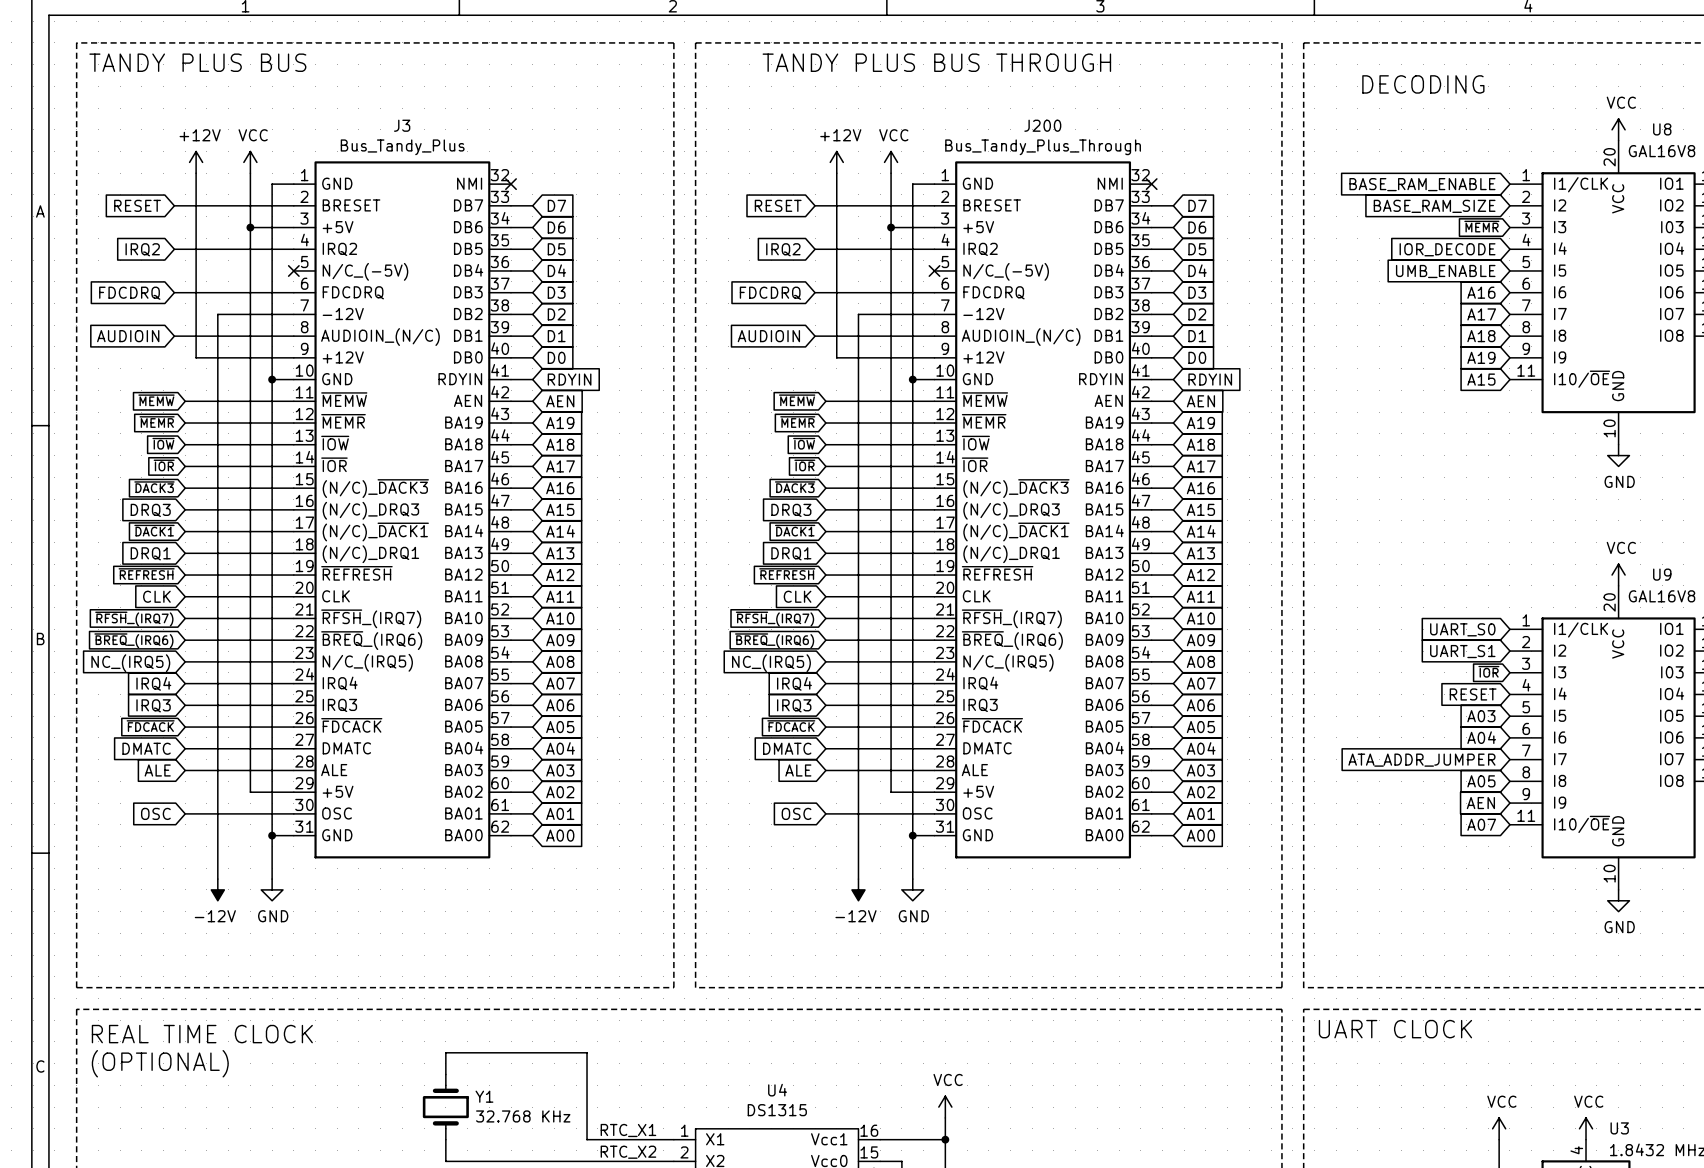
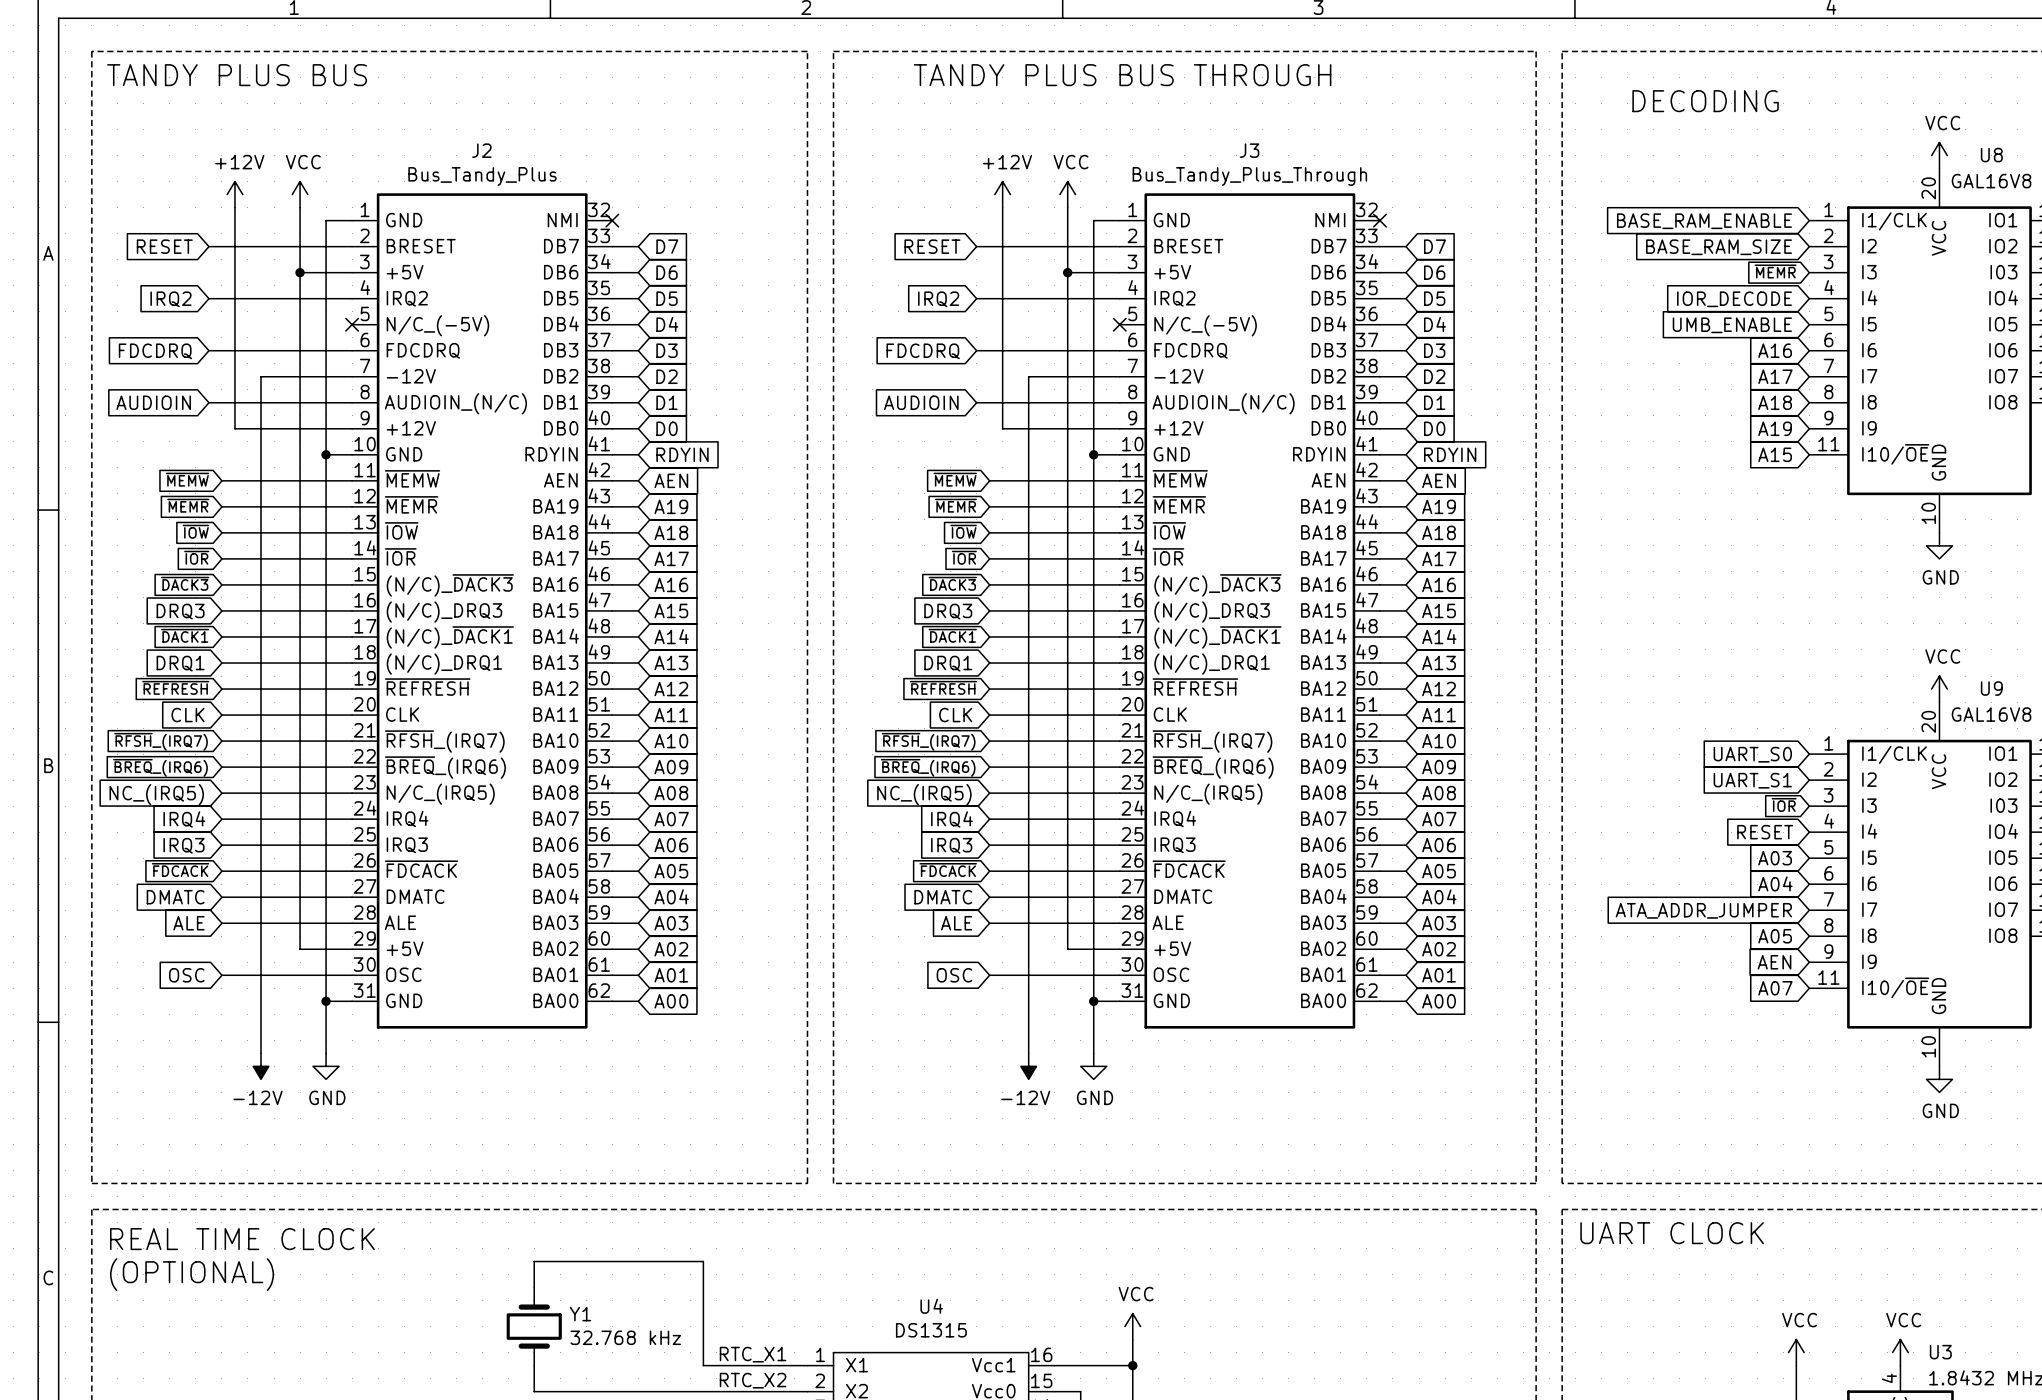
J3 name: J3 (402, 125) -> J2 (481, 150)
J200 name: J200 (1042, 125) -> J3 (1249, 150)
Y1 value: 32.768 KHz (523, 1116) -> 32.768 kHz (625, 1337)

